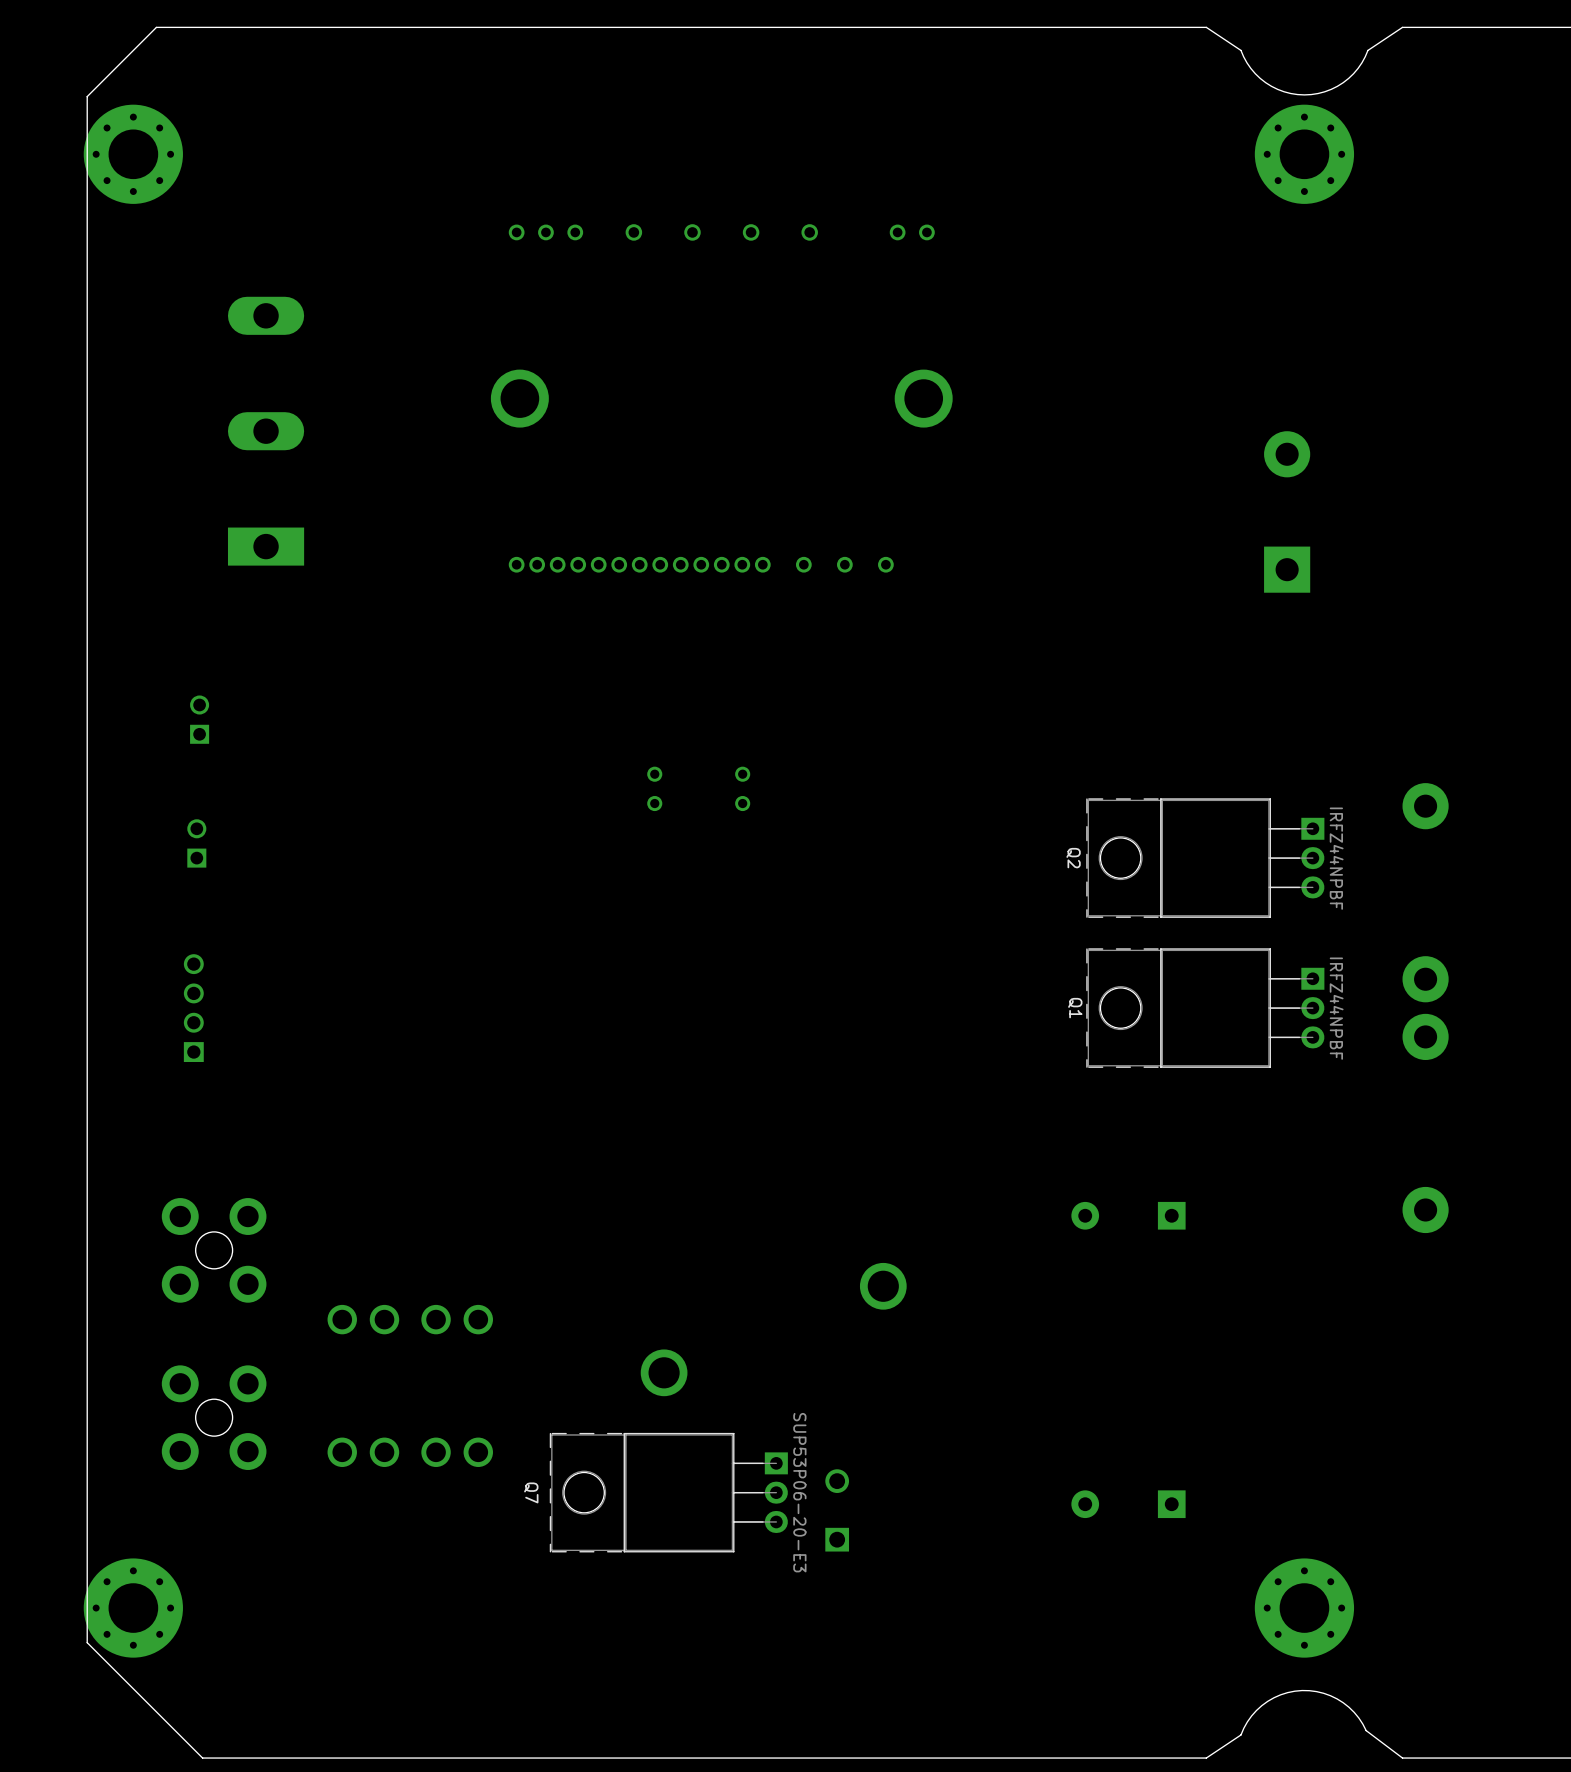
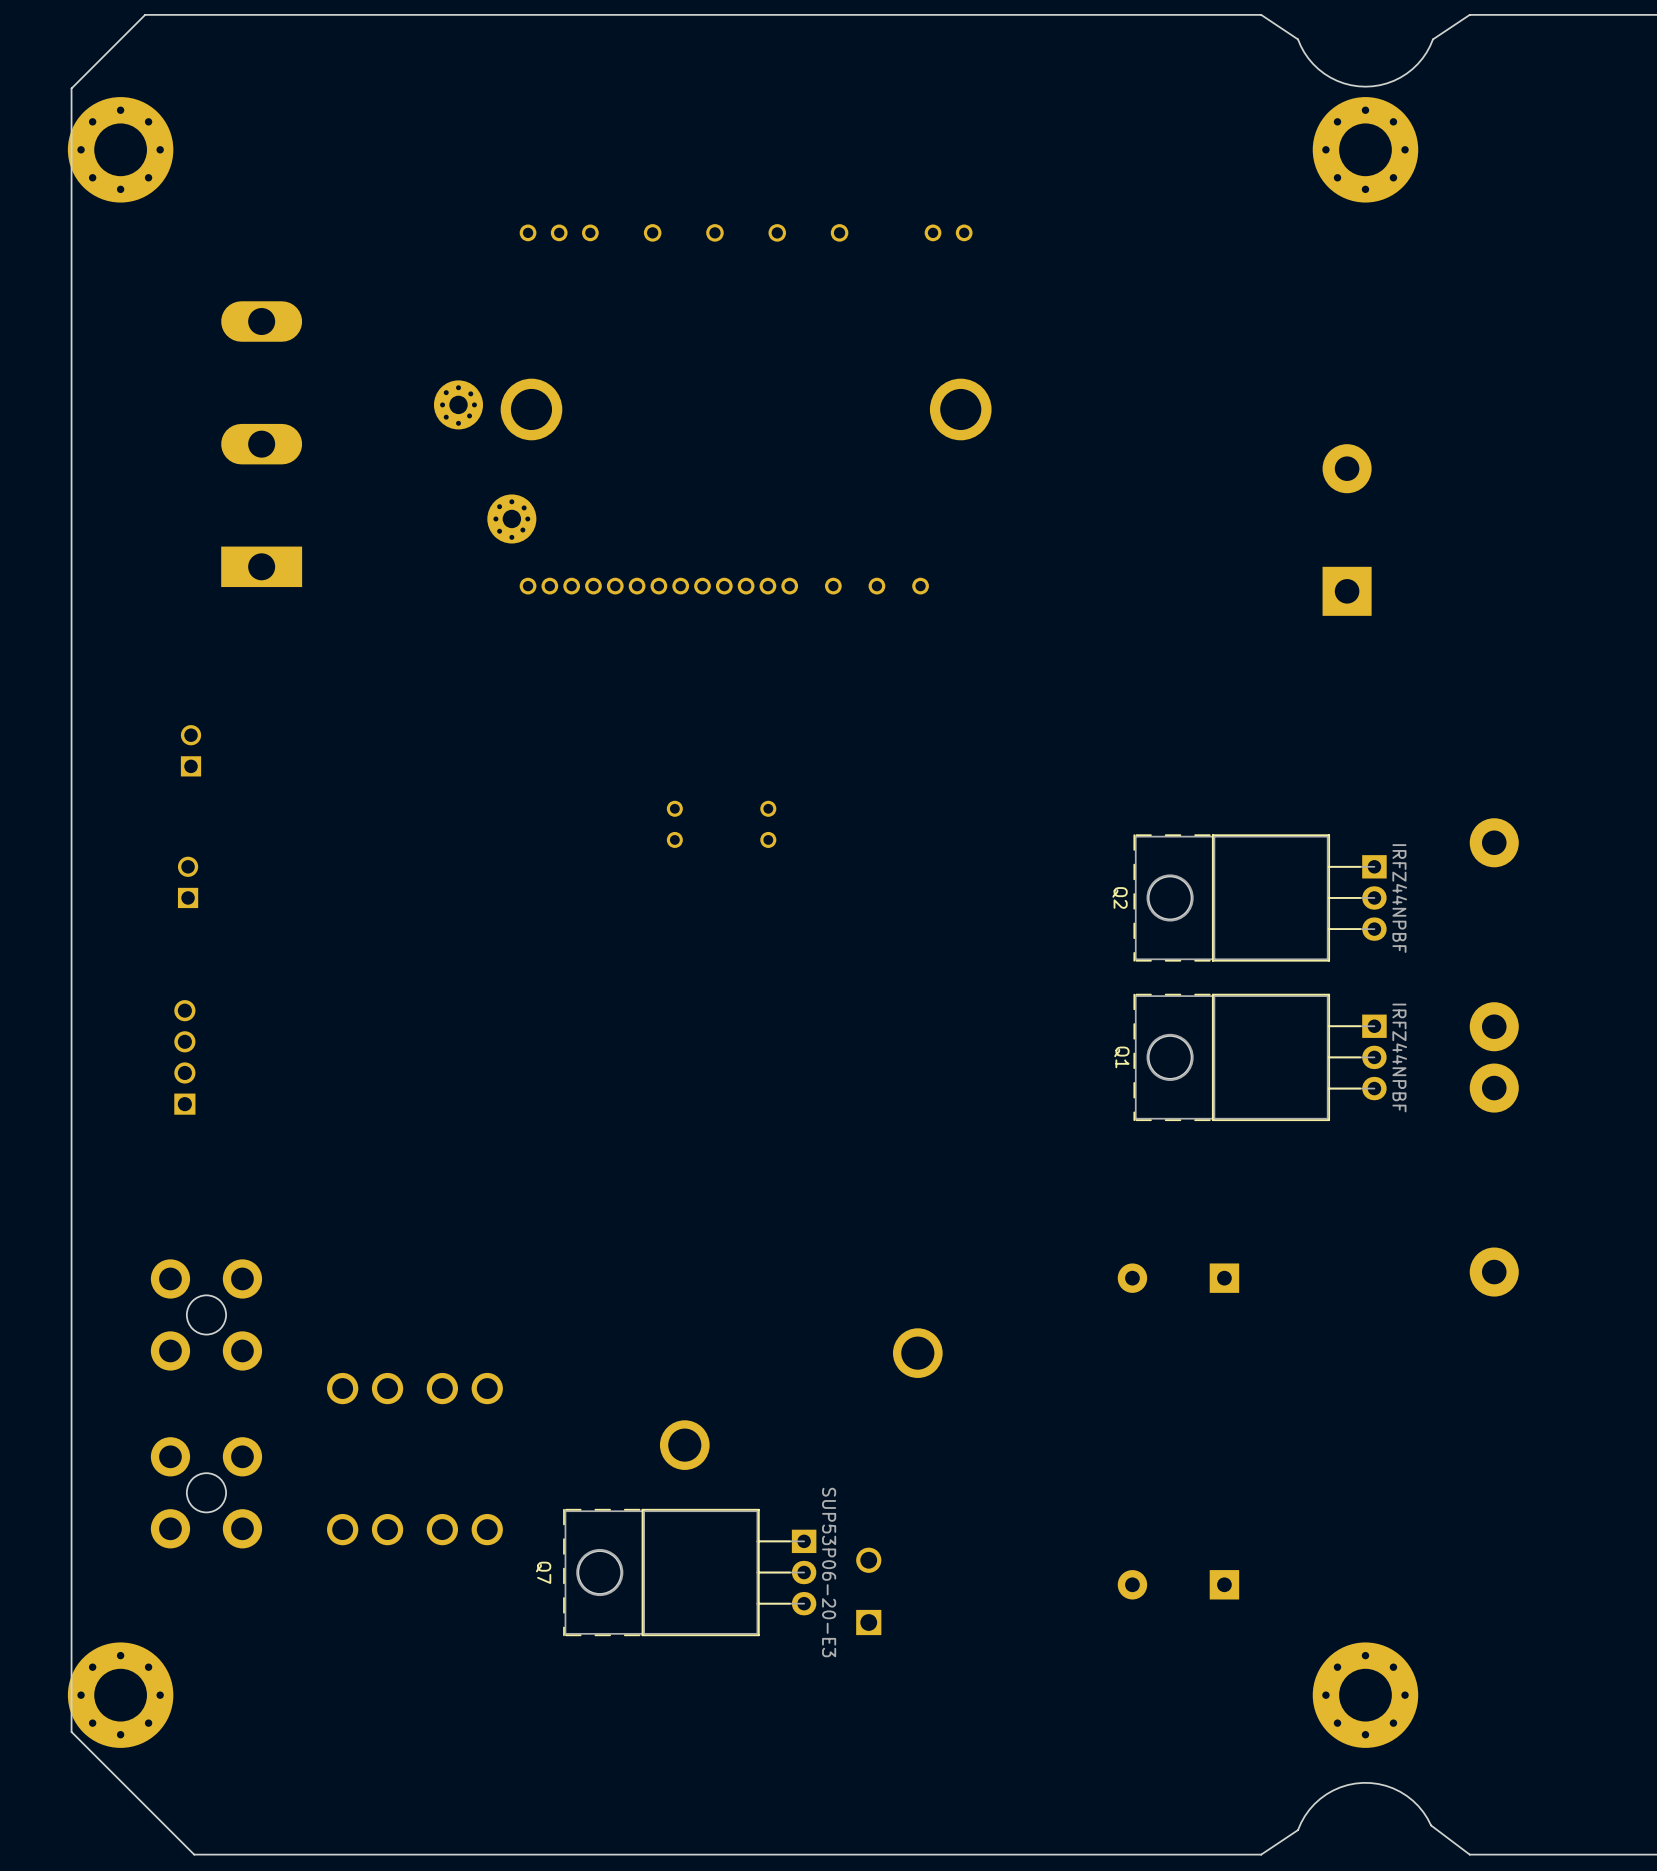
part: none -> (458, 404)
part: none -> (511, 518)

